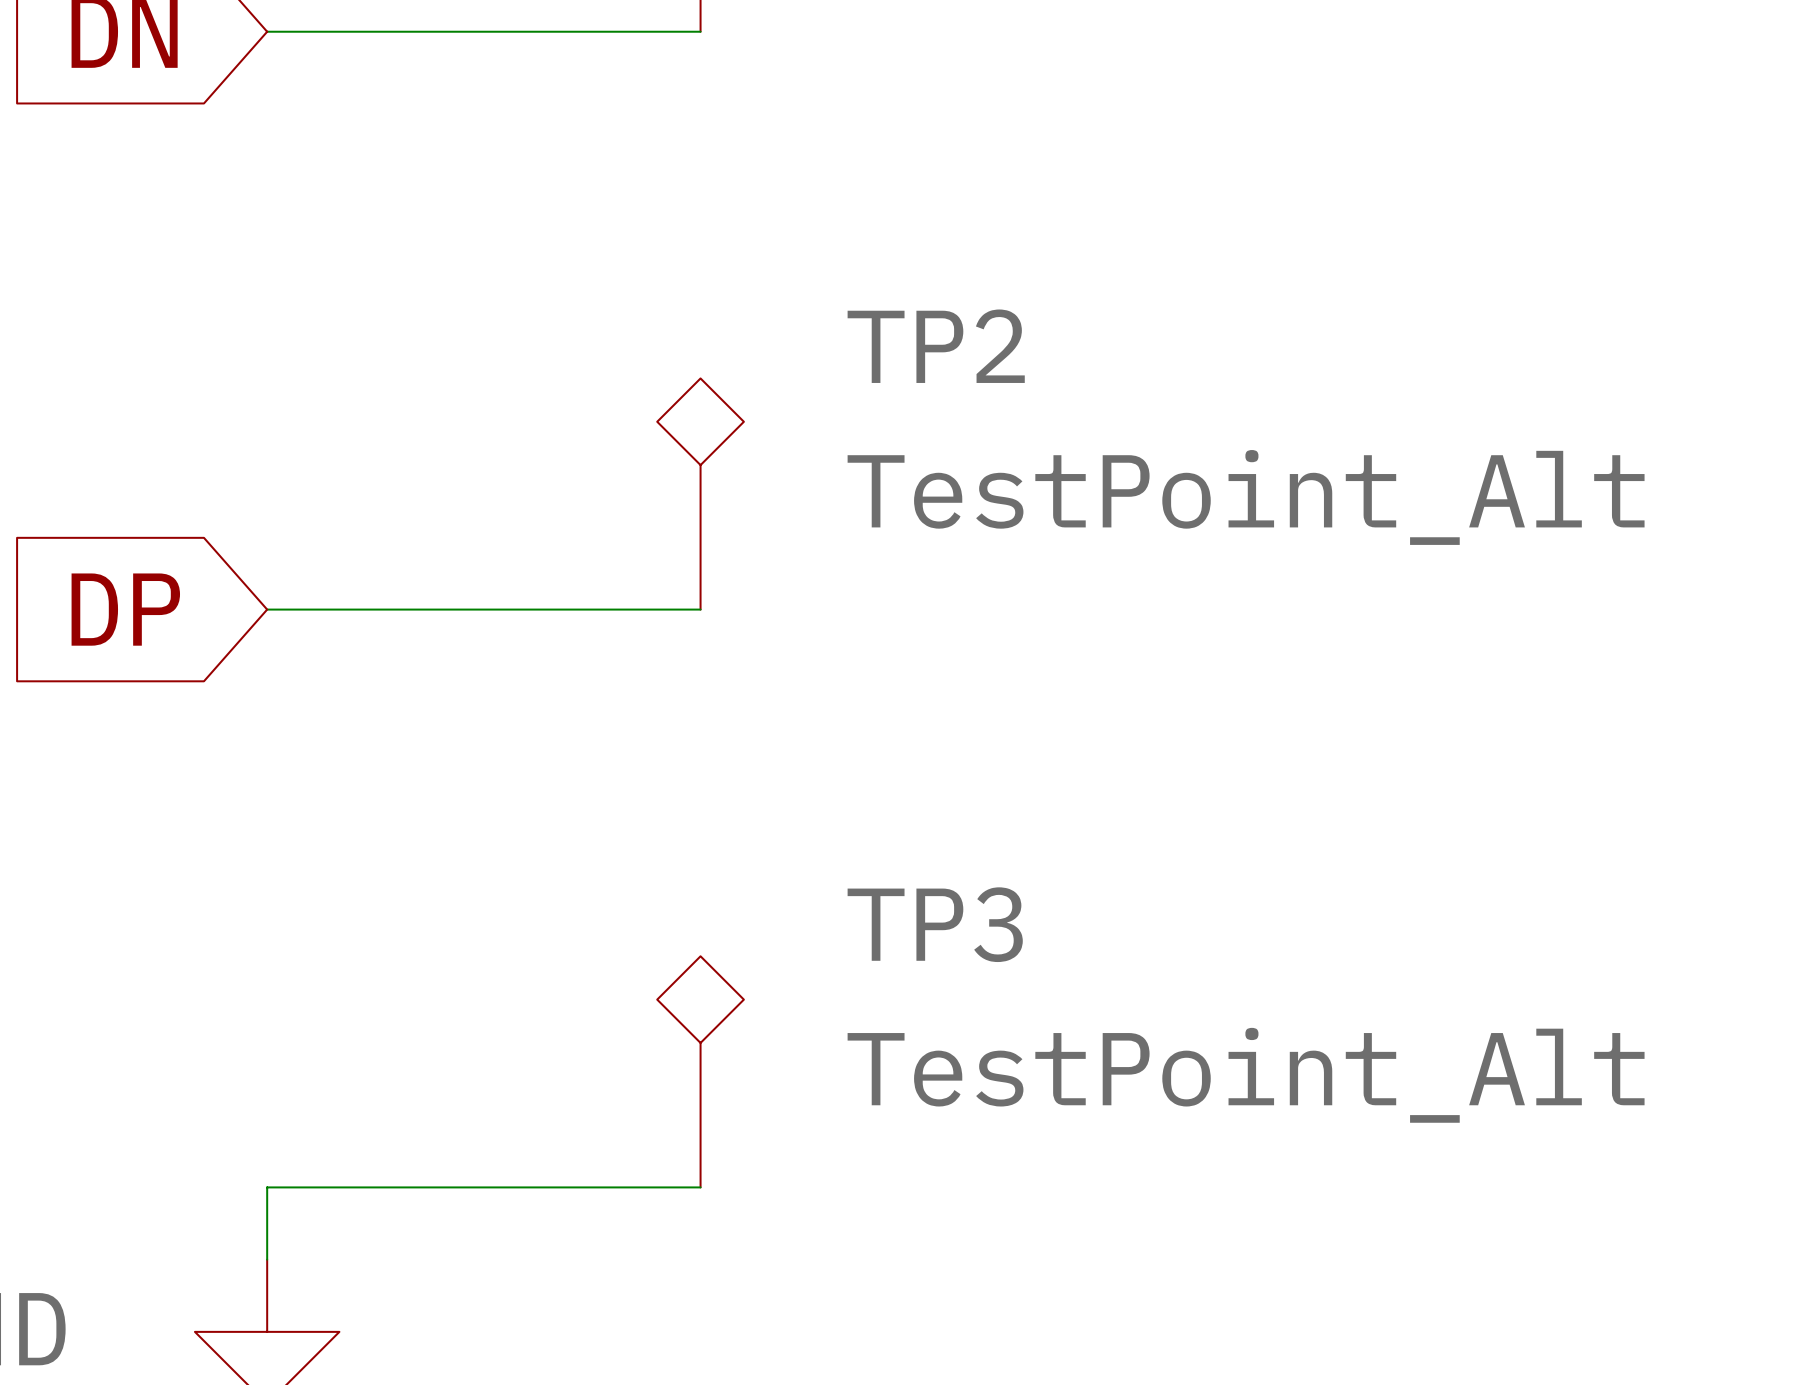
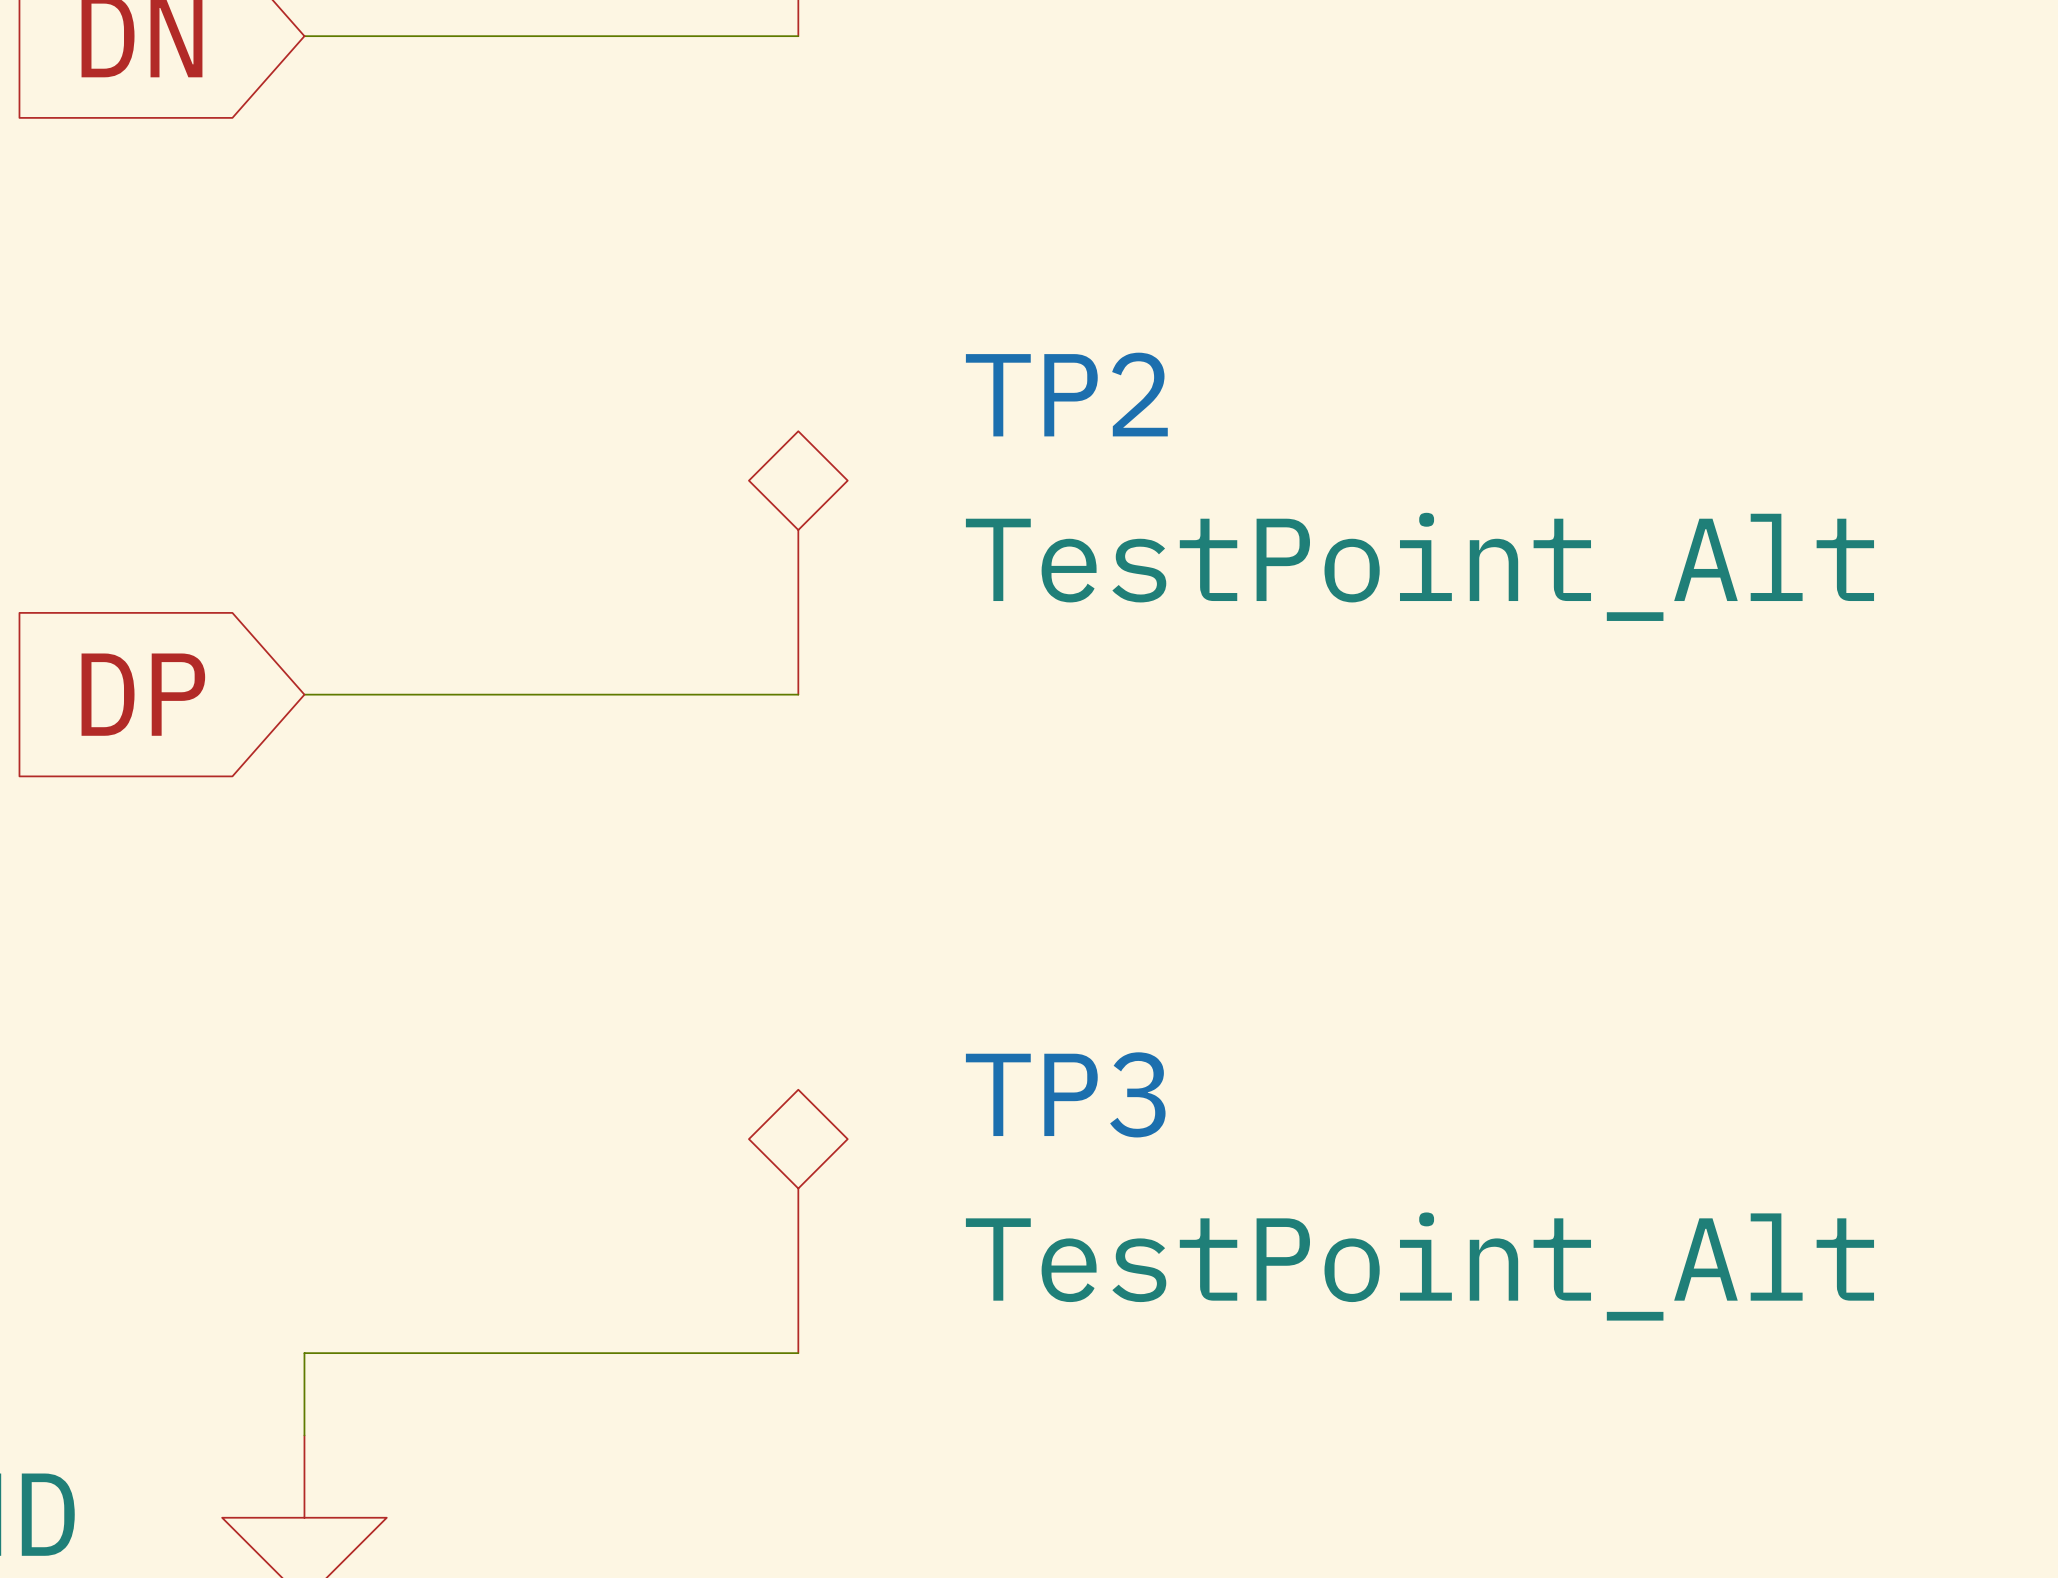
TP3 name position: TP3 (935, 924) -> TP3 (1065, 1094)
TP3 value position: TestPoint_Alt (1246, 1075) -> TestPoint_Alt (1419, 1266)

